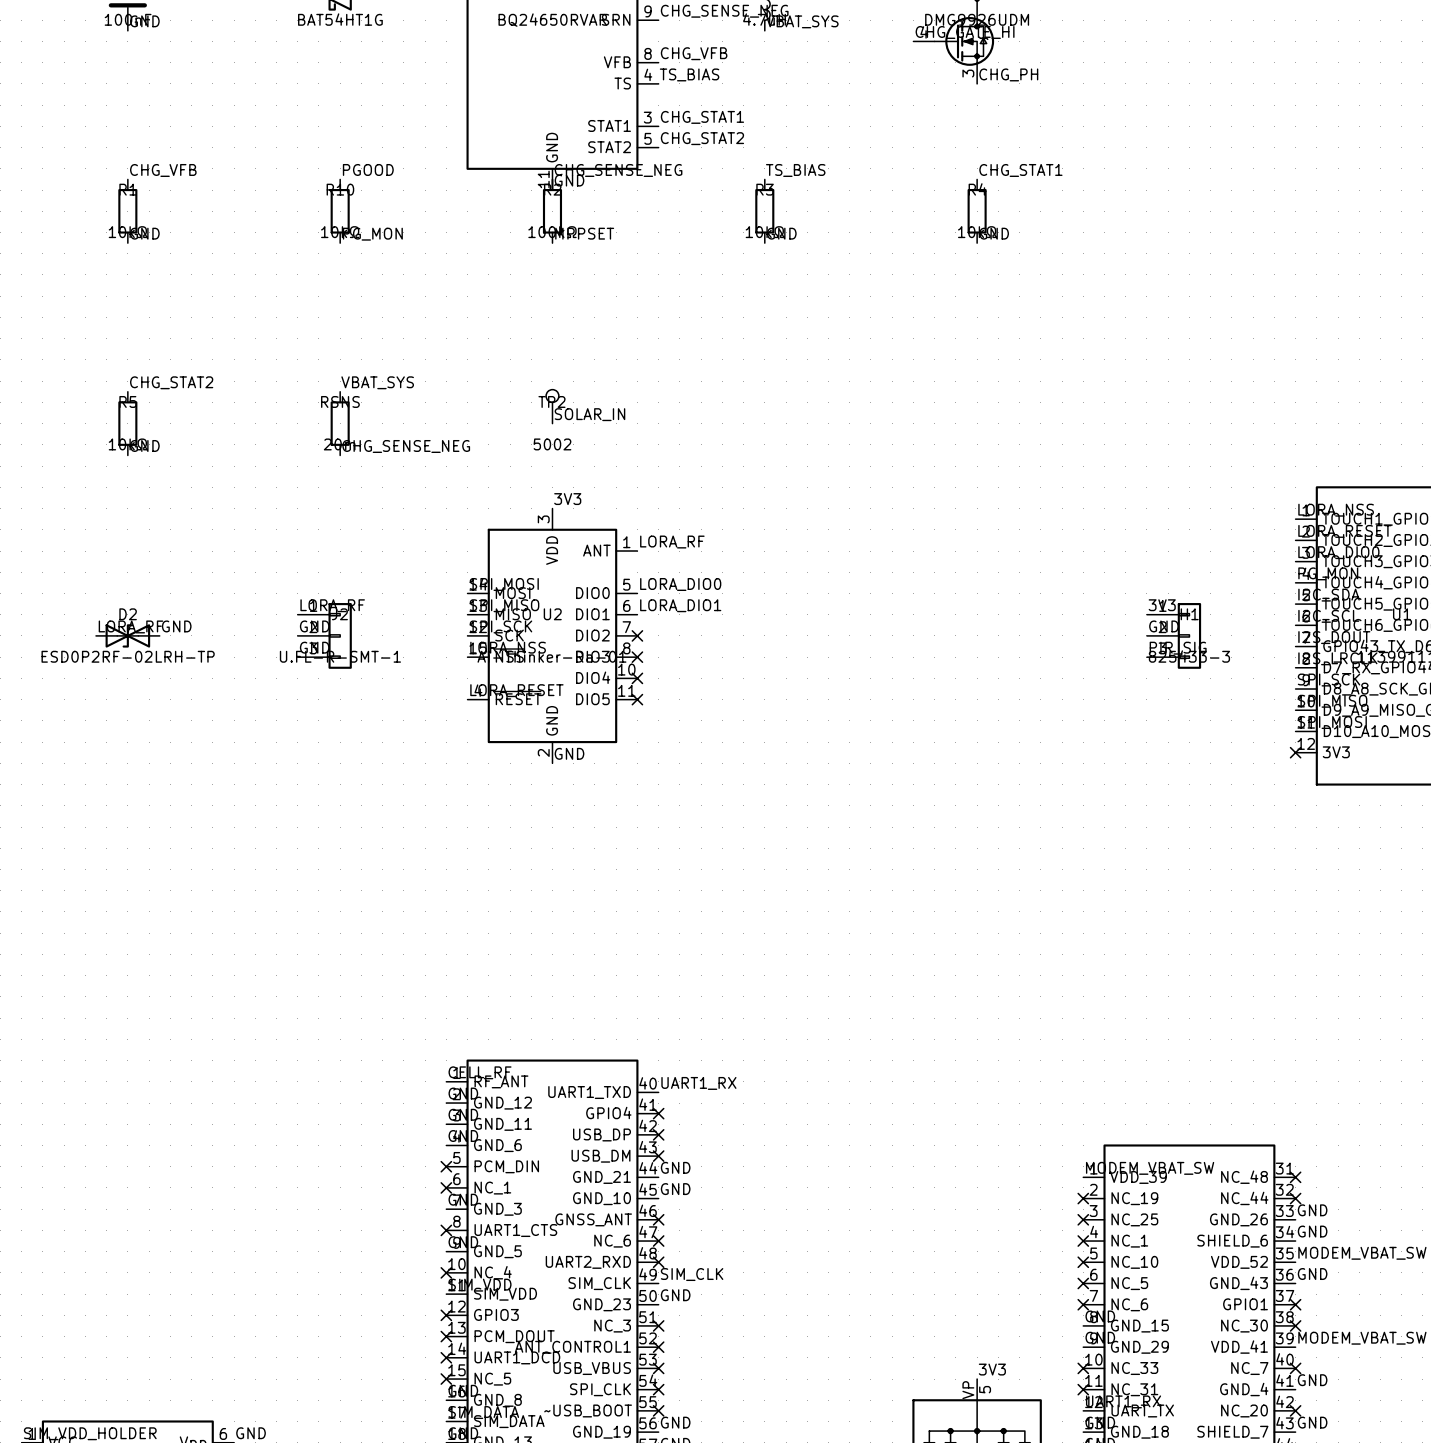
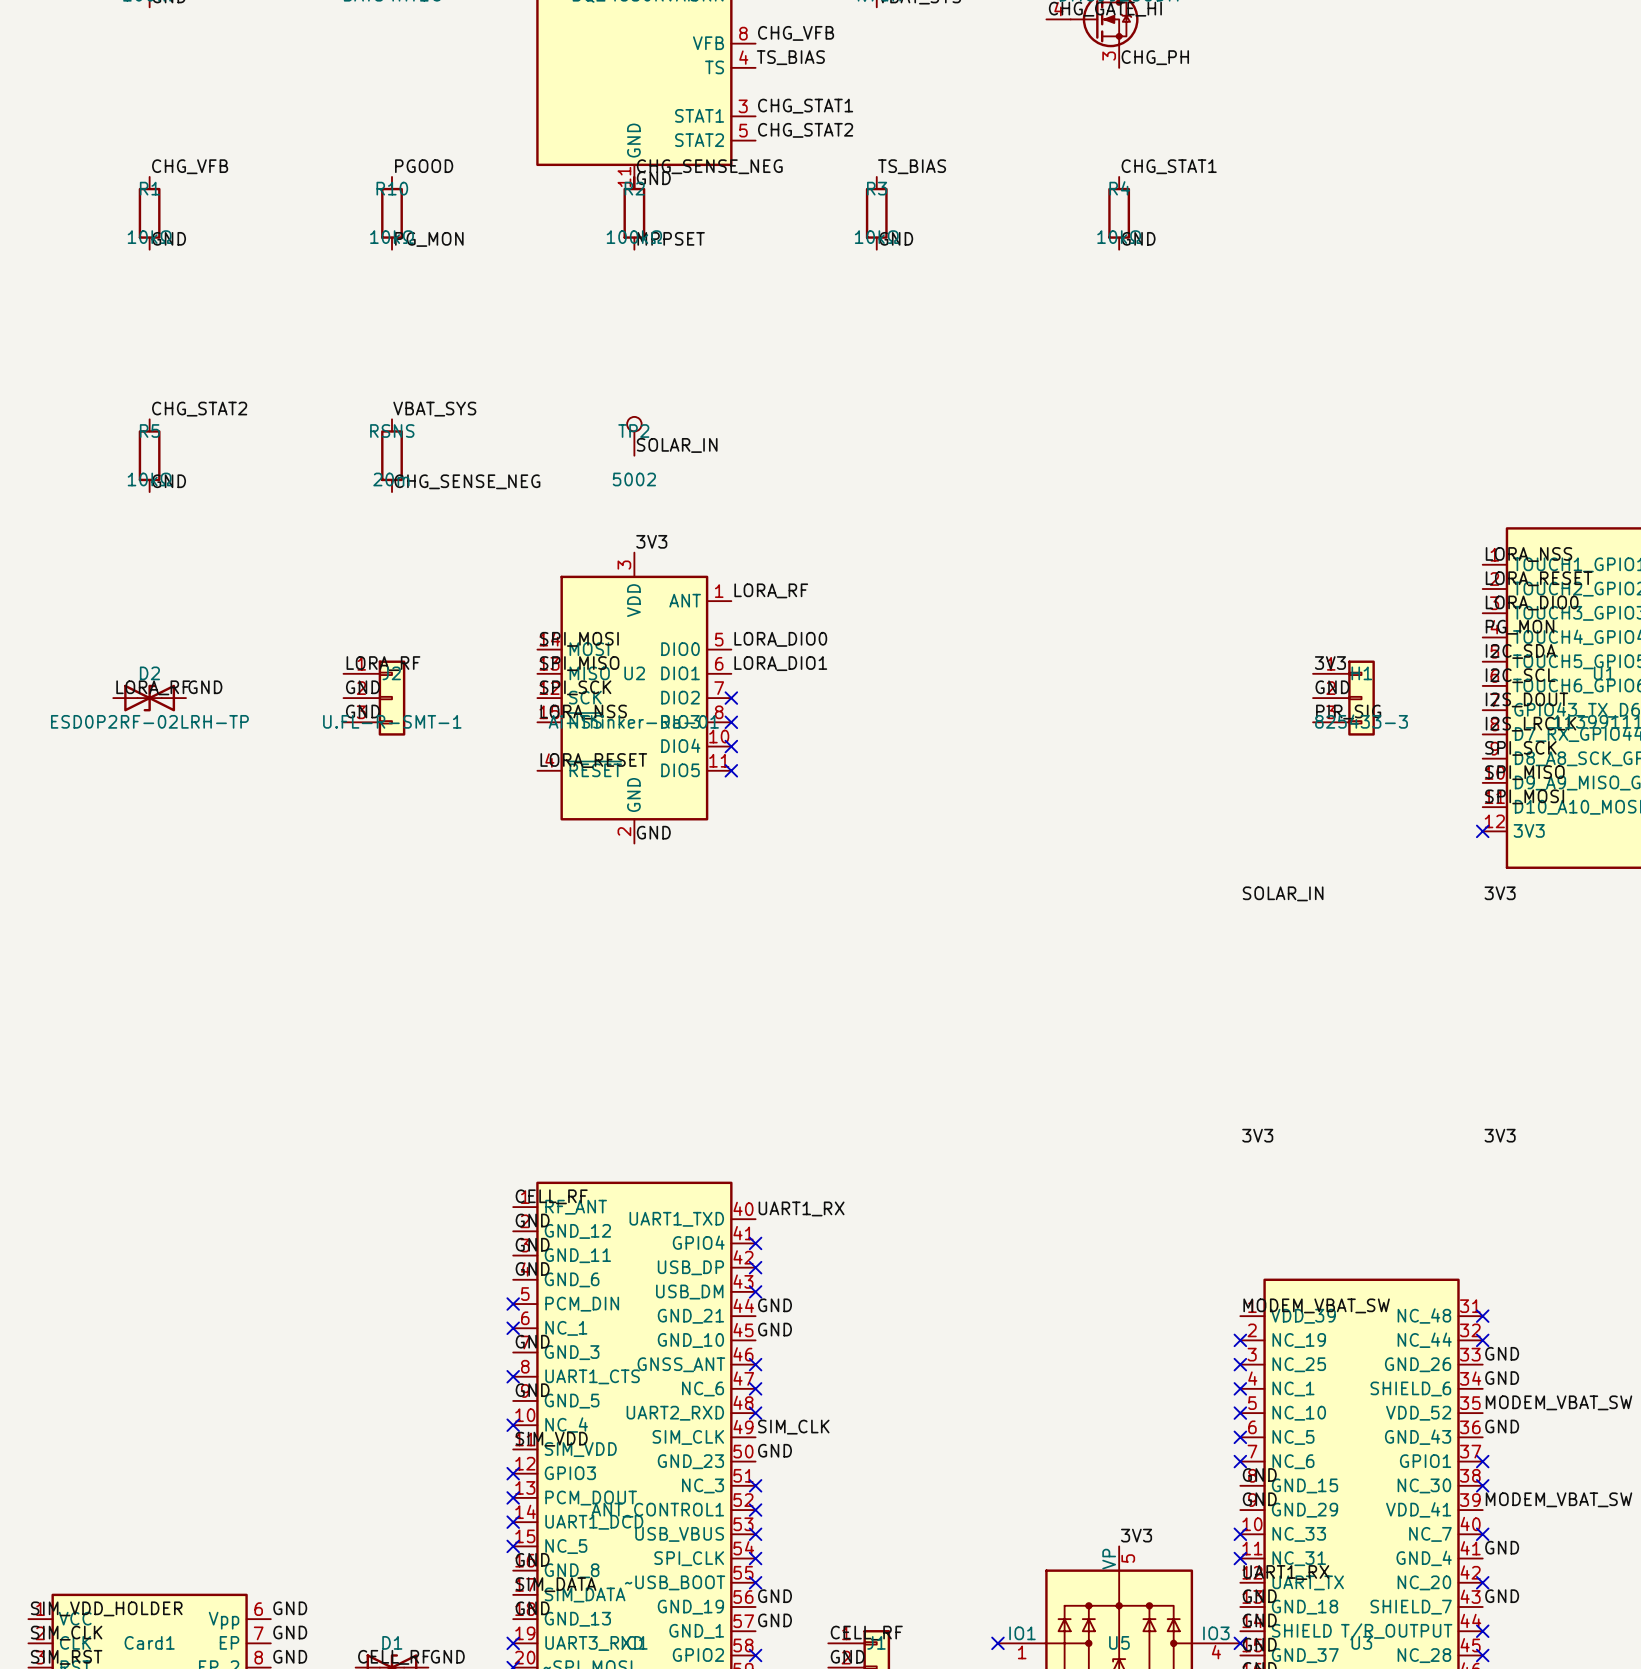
label: none -> 3V3 (1500, 893)
label: none -> SOLAR_IN (1283, 893)
label: none -> 3V3 (1257, 1135)
label: none -> 3V3 (1500, 1135)

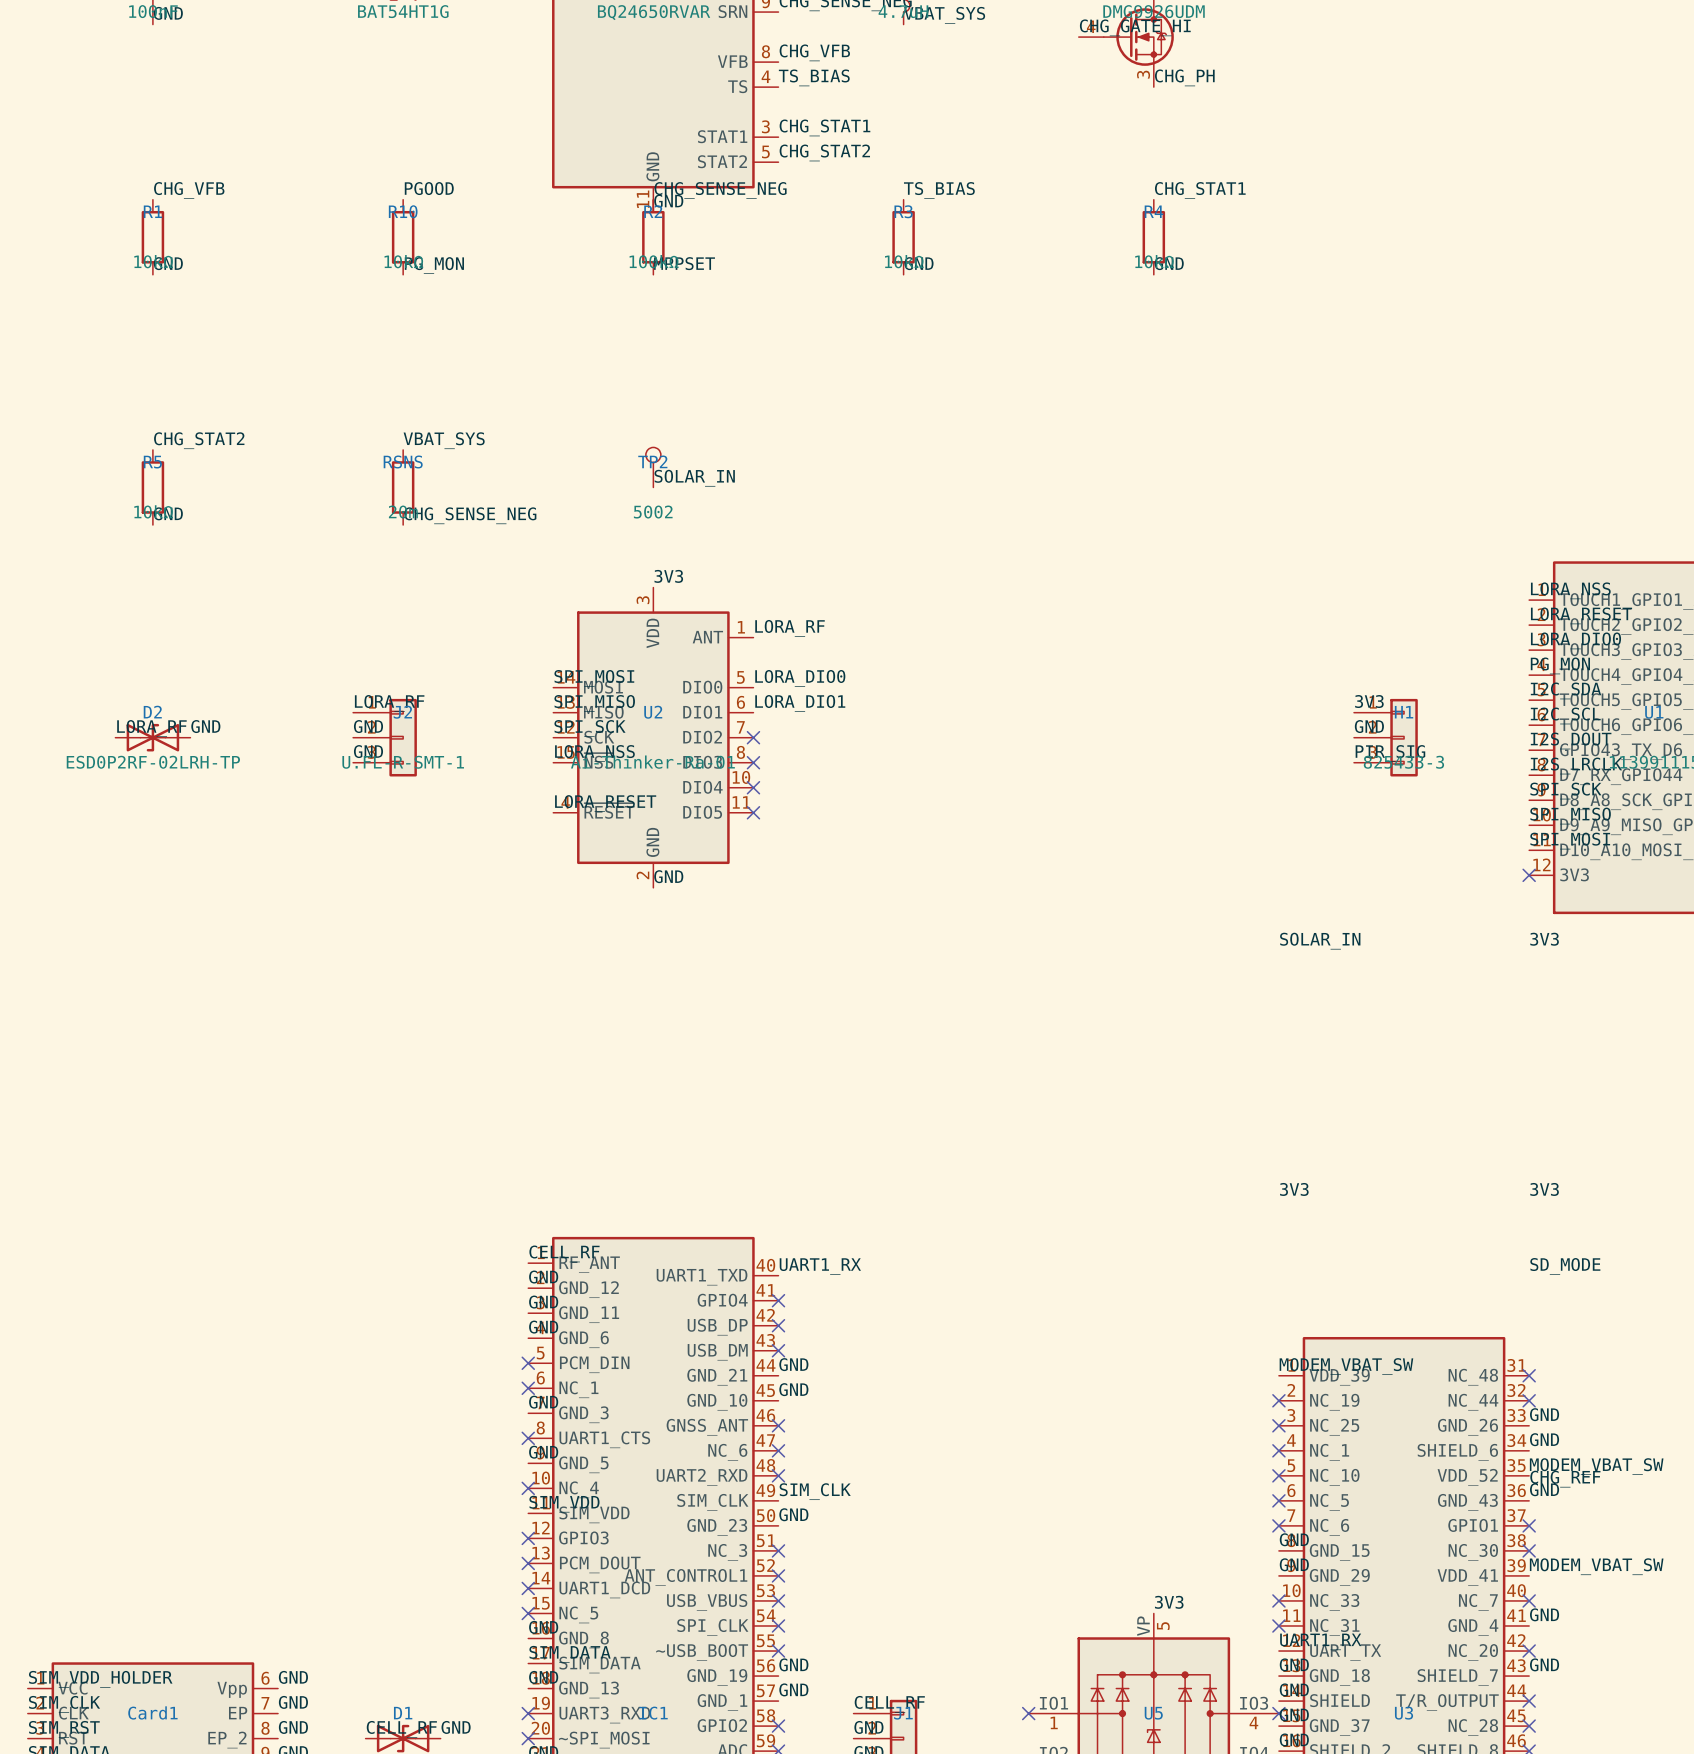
label: none -> SD_MODE (1565, 1266)
label: none -> CHG_REF (1565, 1479)

